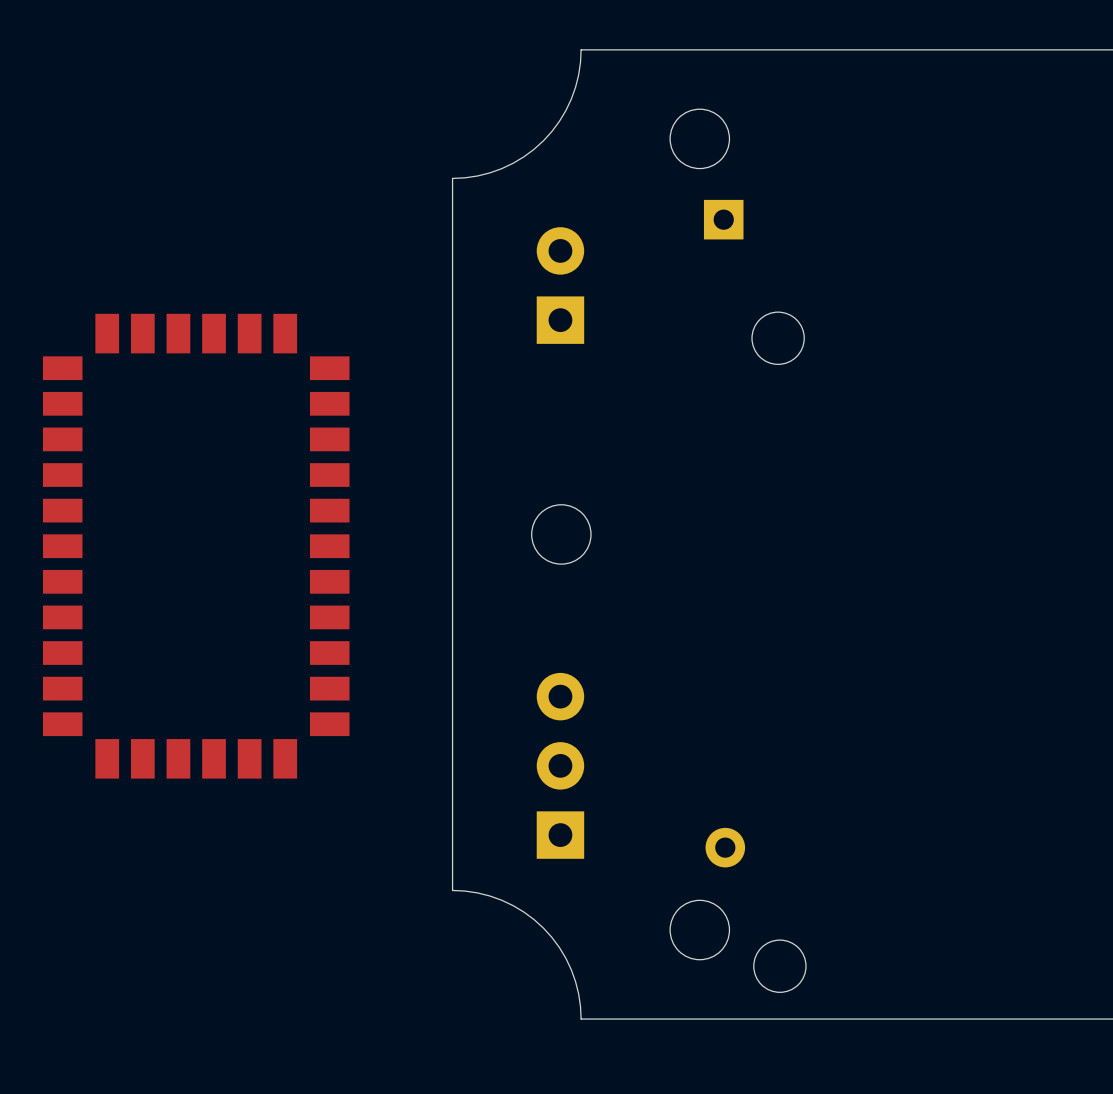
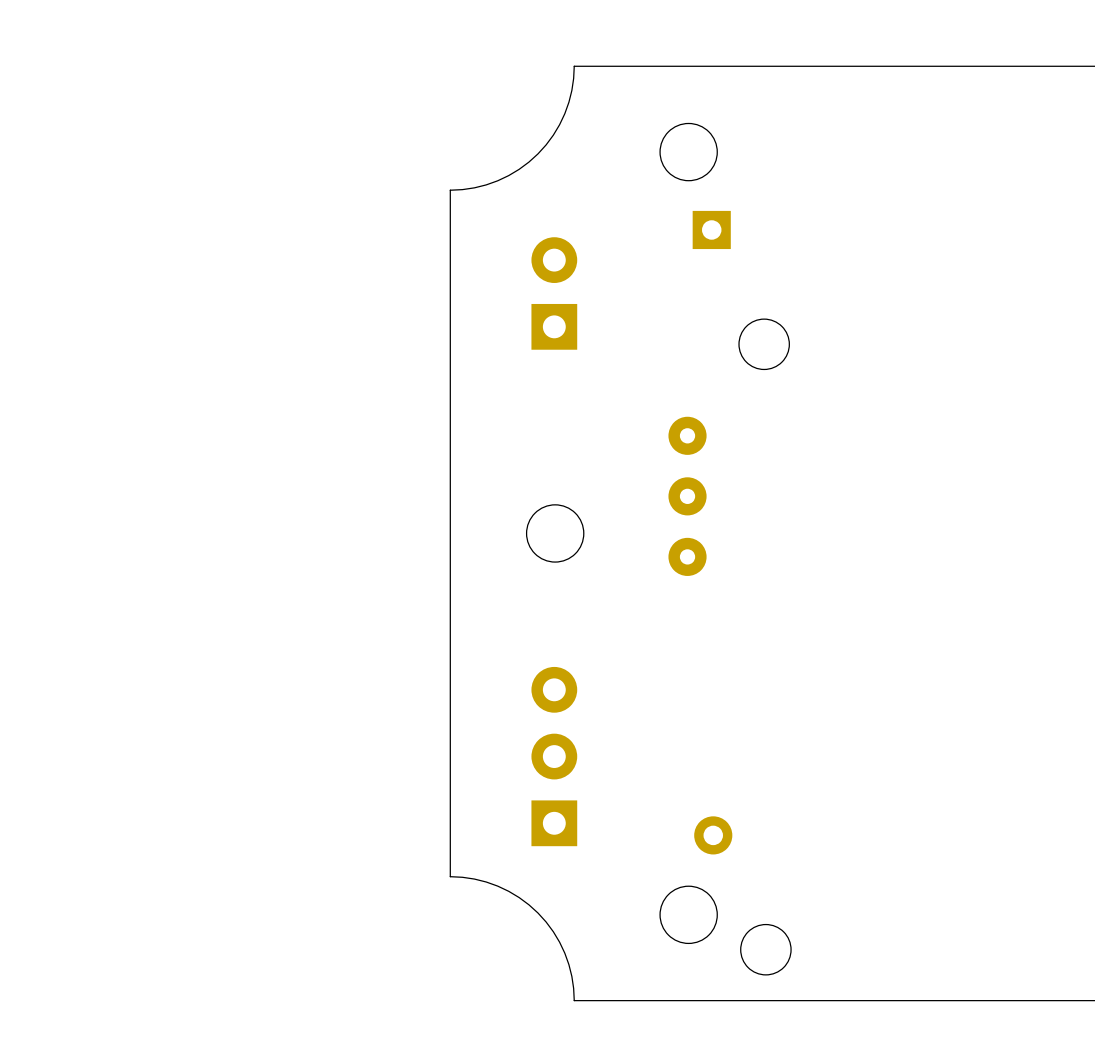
part: none -> (687, 435)
part: none -> (687, 496)
part: (196, 546) -> none
part: none -> (687, 556)

